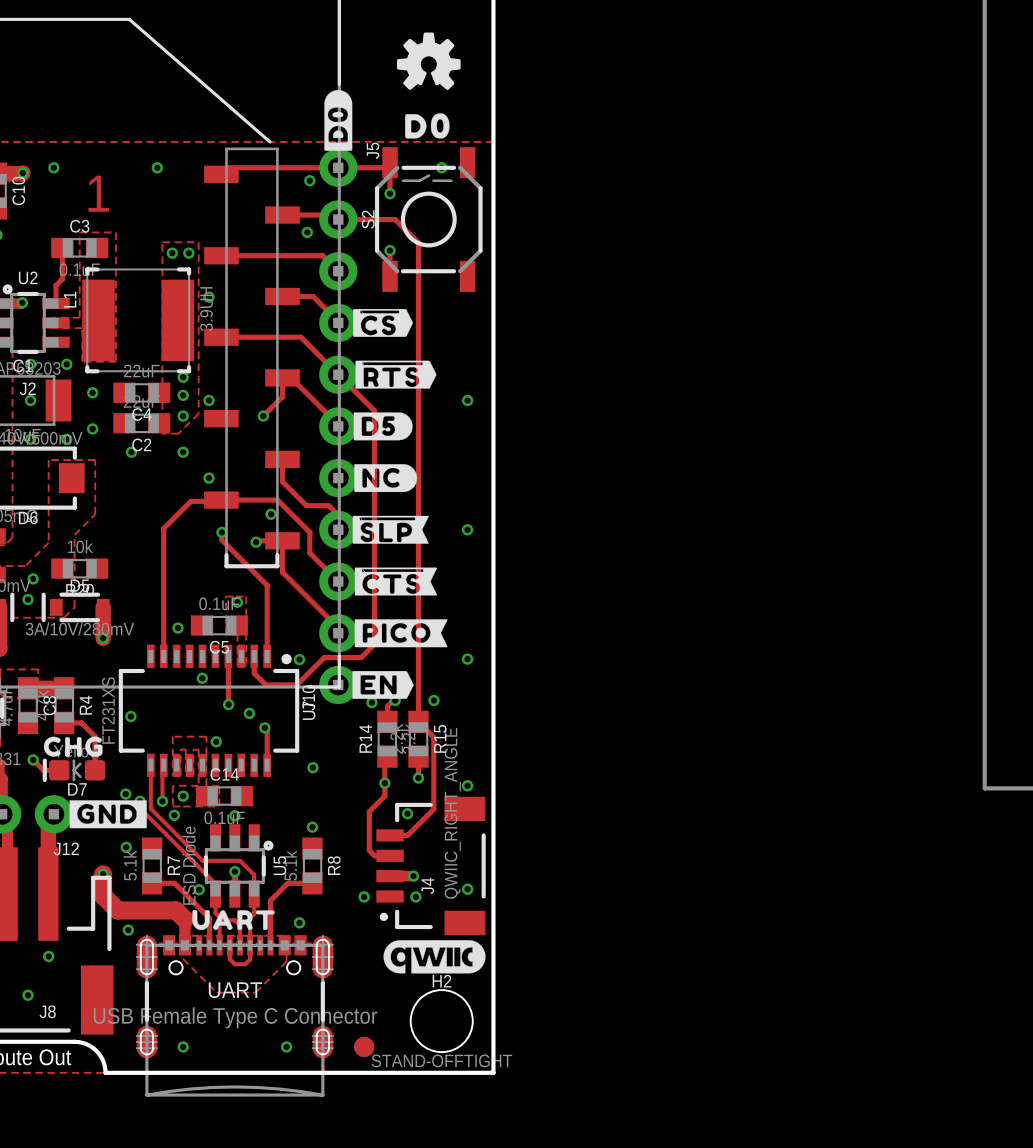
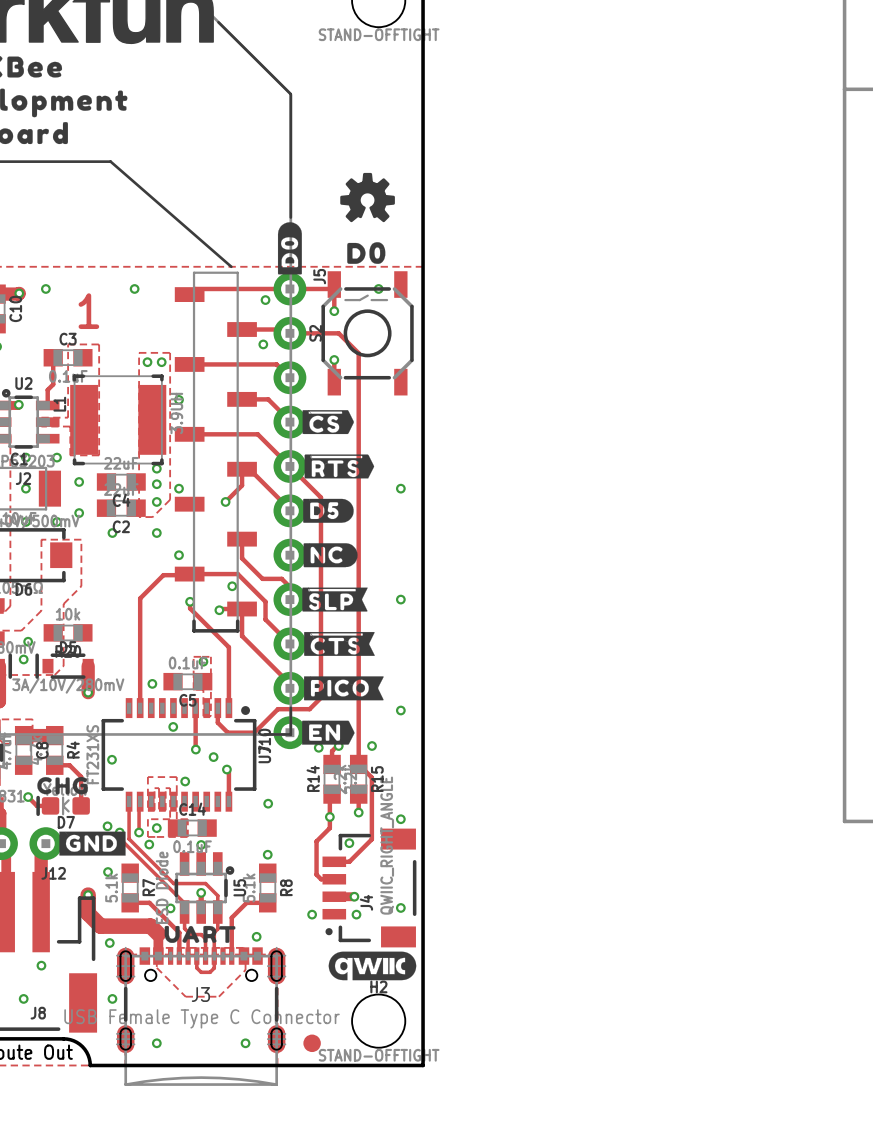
via: (299, 659) -> none
UART name: UART (235, 990) -> J3 (200, 994)
via: none -> (112, 998)

